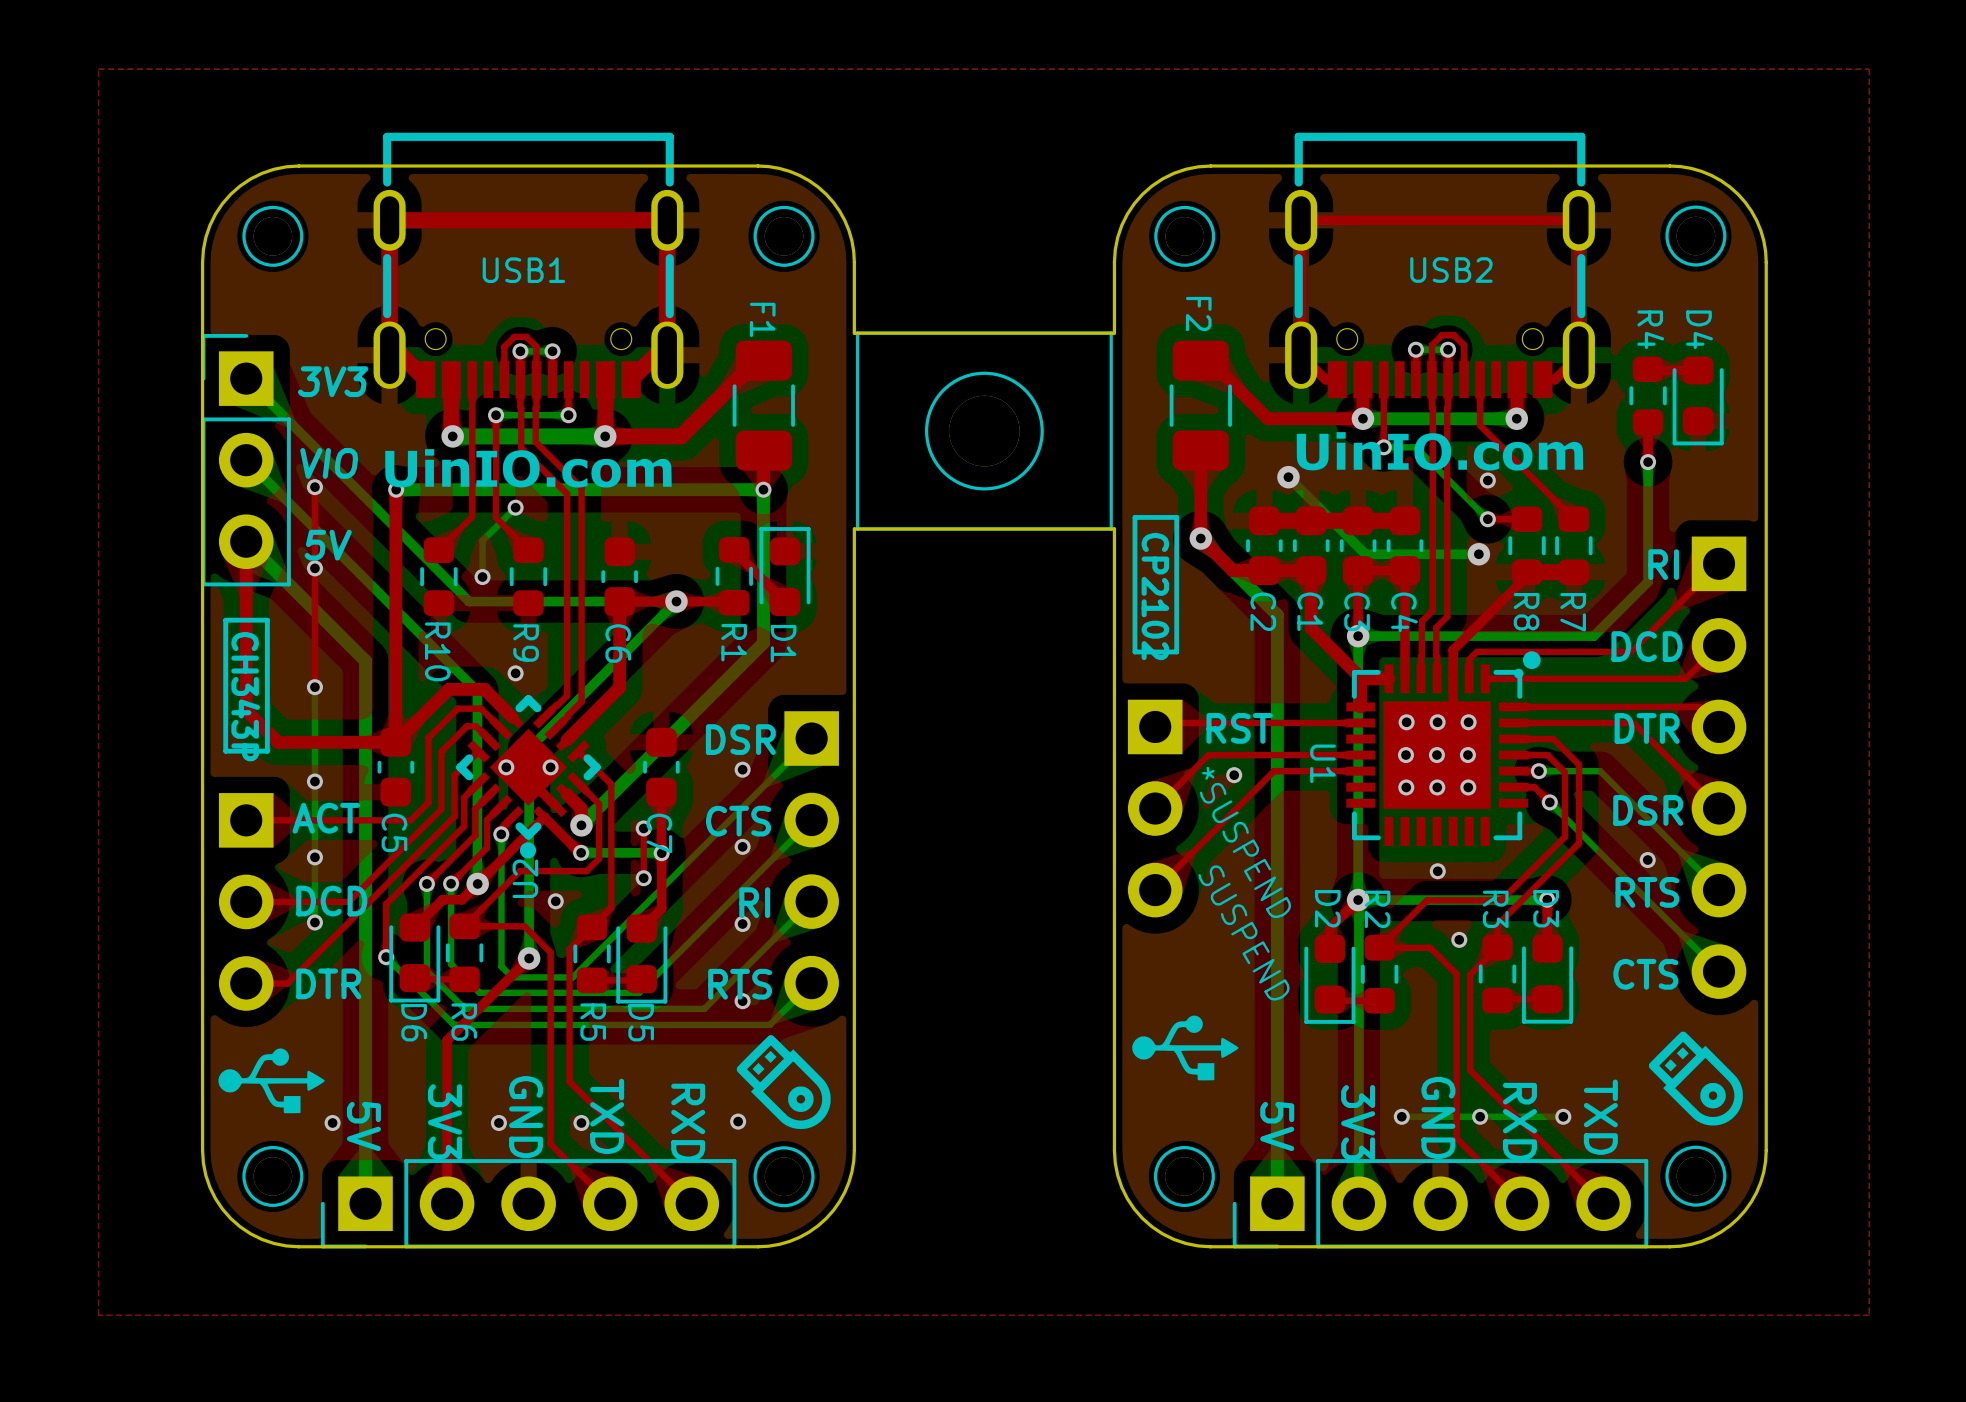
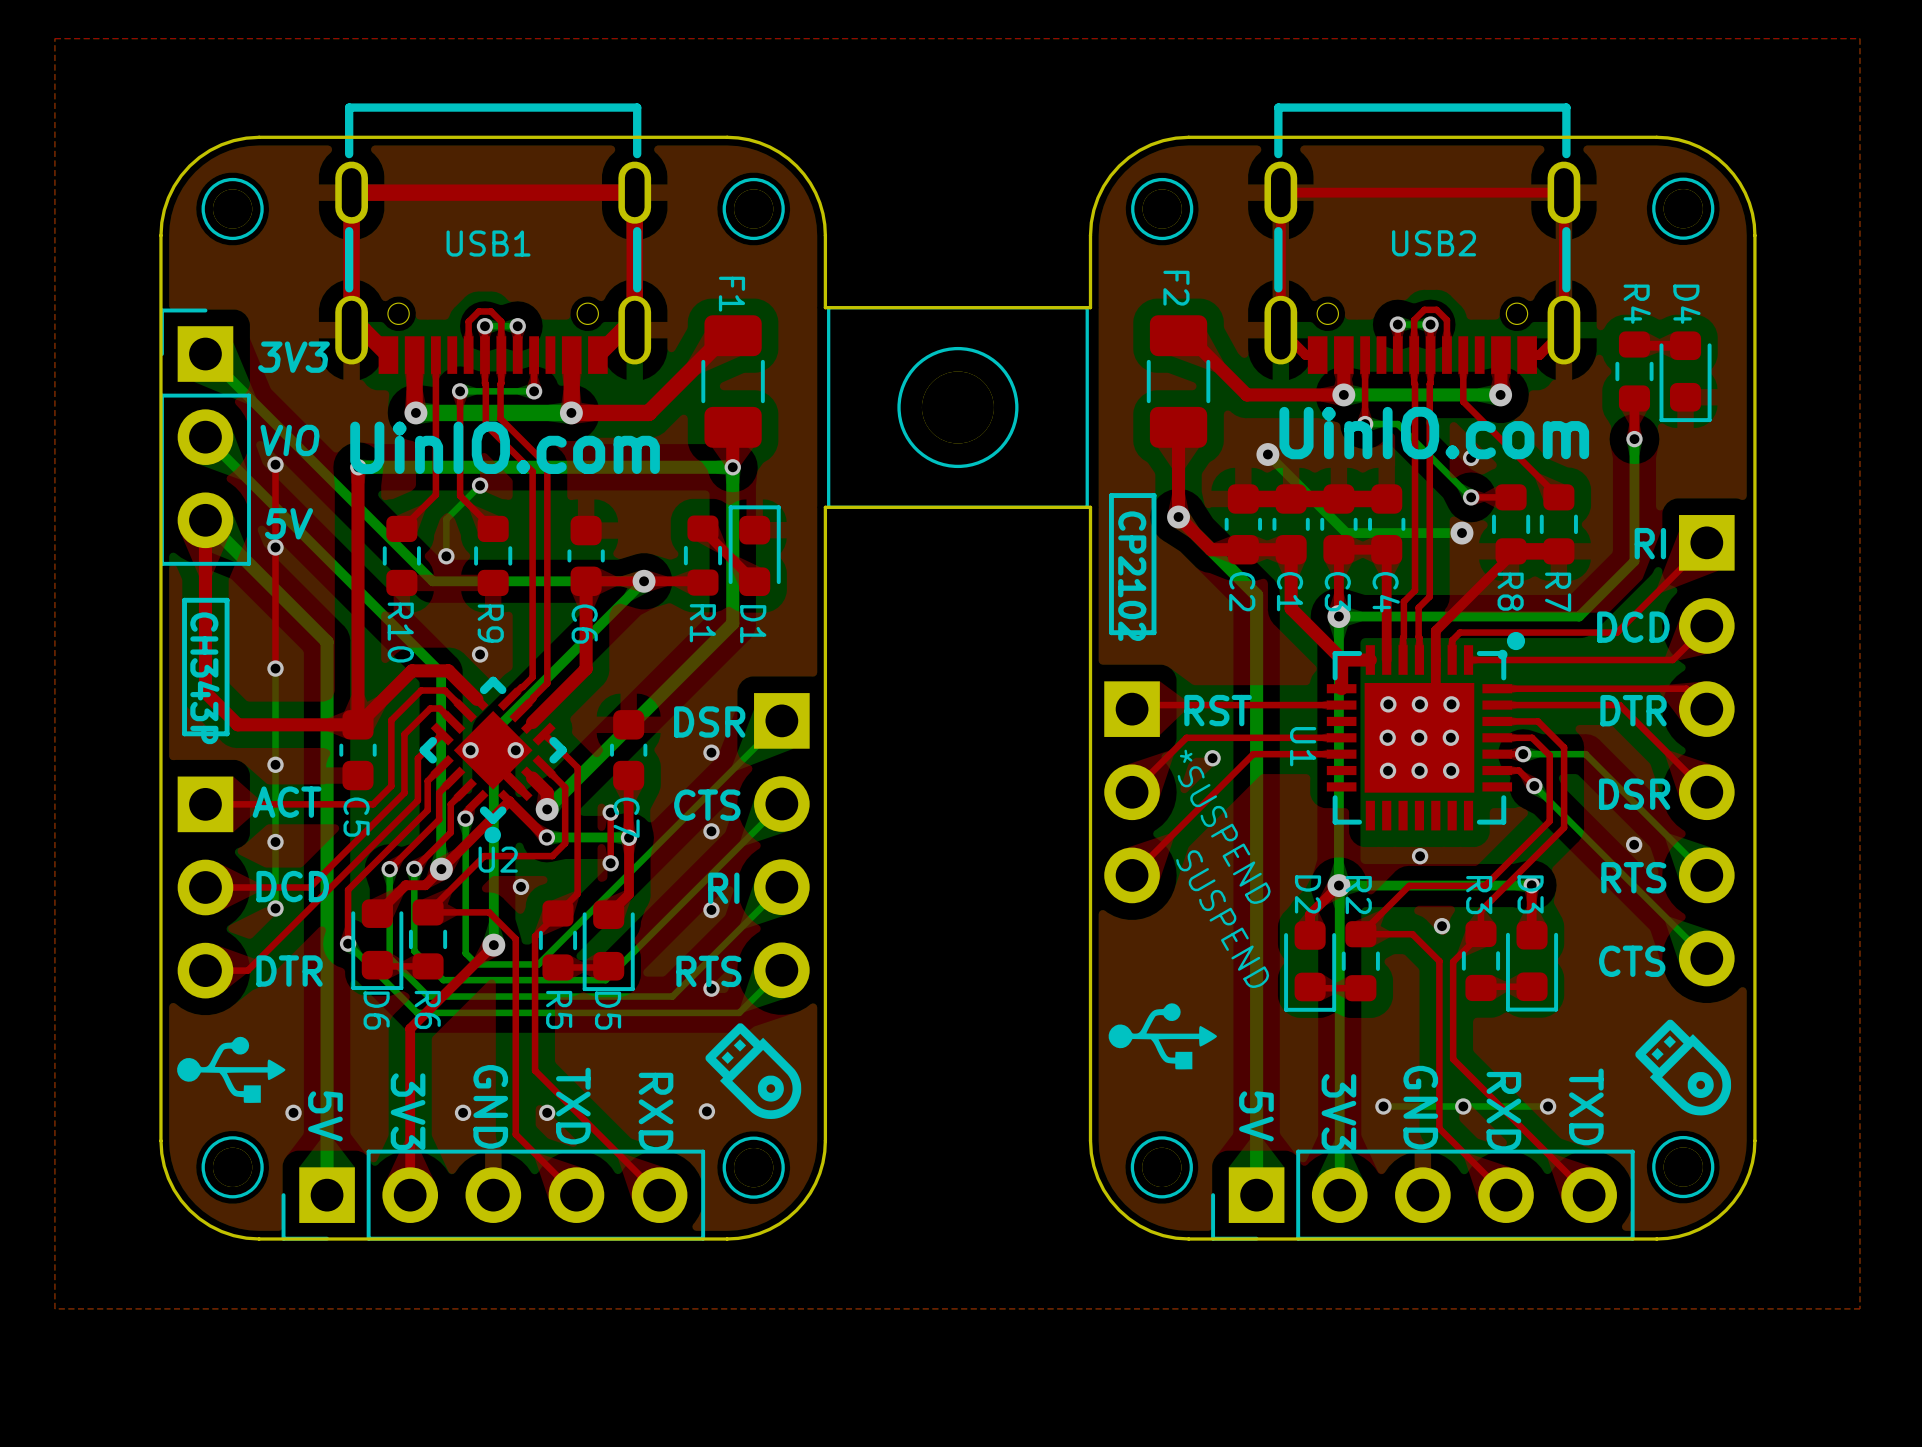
drawing: [1296, 432, 1584, 471] -> none
drawing: [385, 449, 672, 488] -> none
text: none -> UinIO.com (1434, 433)
text: none -> UinIO.com (505, 447)
U2 name rotation: 0° (525, 878) -> 90° clockwise (498, 859)

